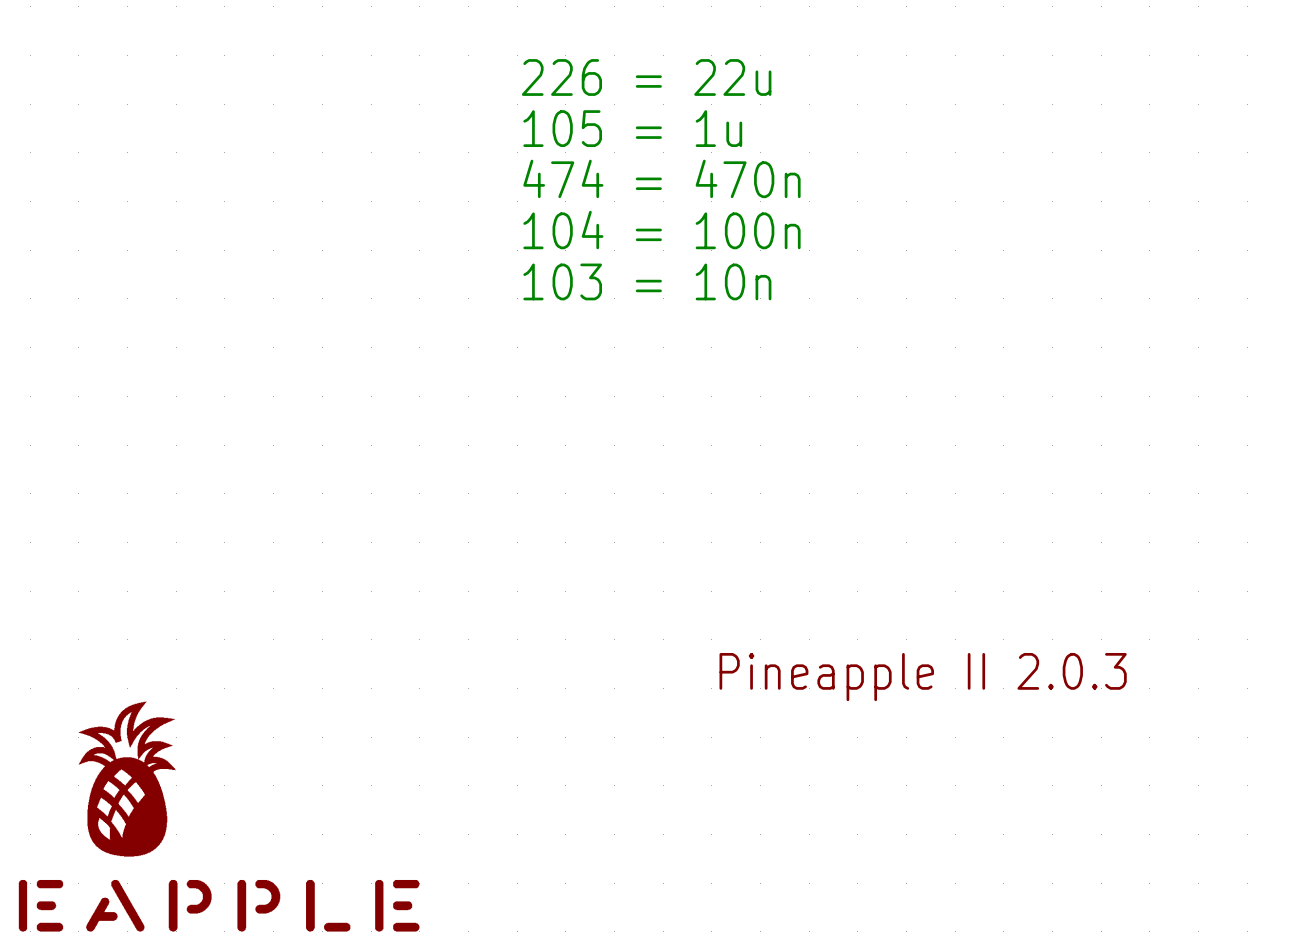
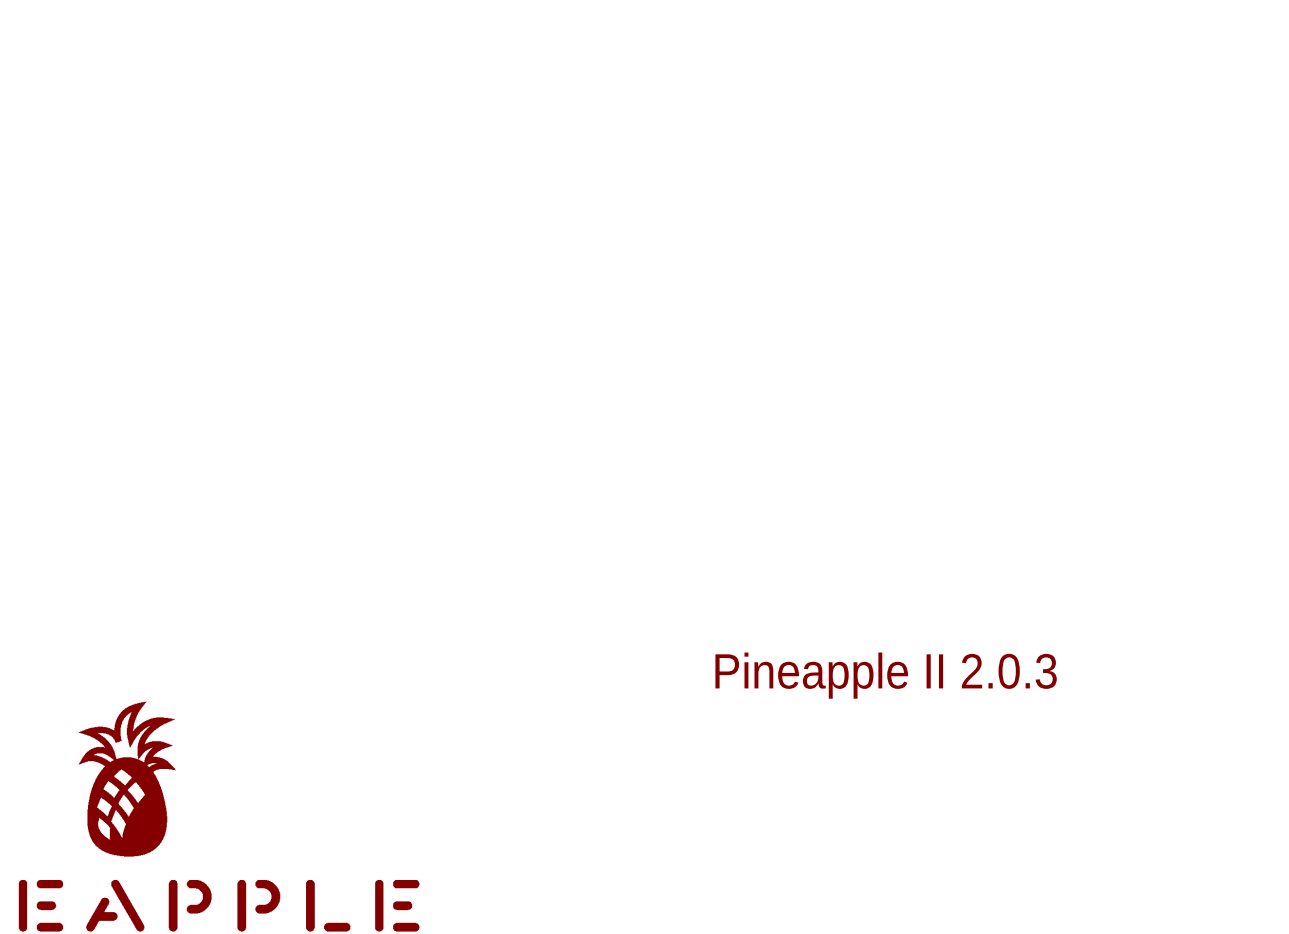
text: 226 = 22u (646, 77) -> none
text: 105 = 1u (632, 128) -> none
text: 474 = 470n (661, 178) -> none
text: 104 = 100n (661, 230) -> none
text: 103 = 10n (647, 281) -> none

